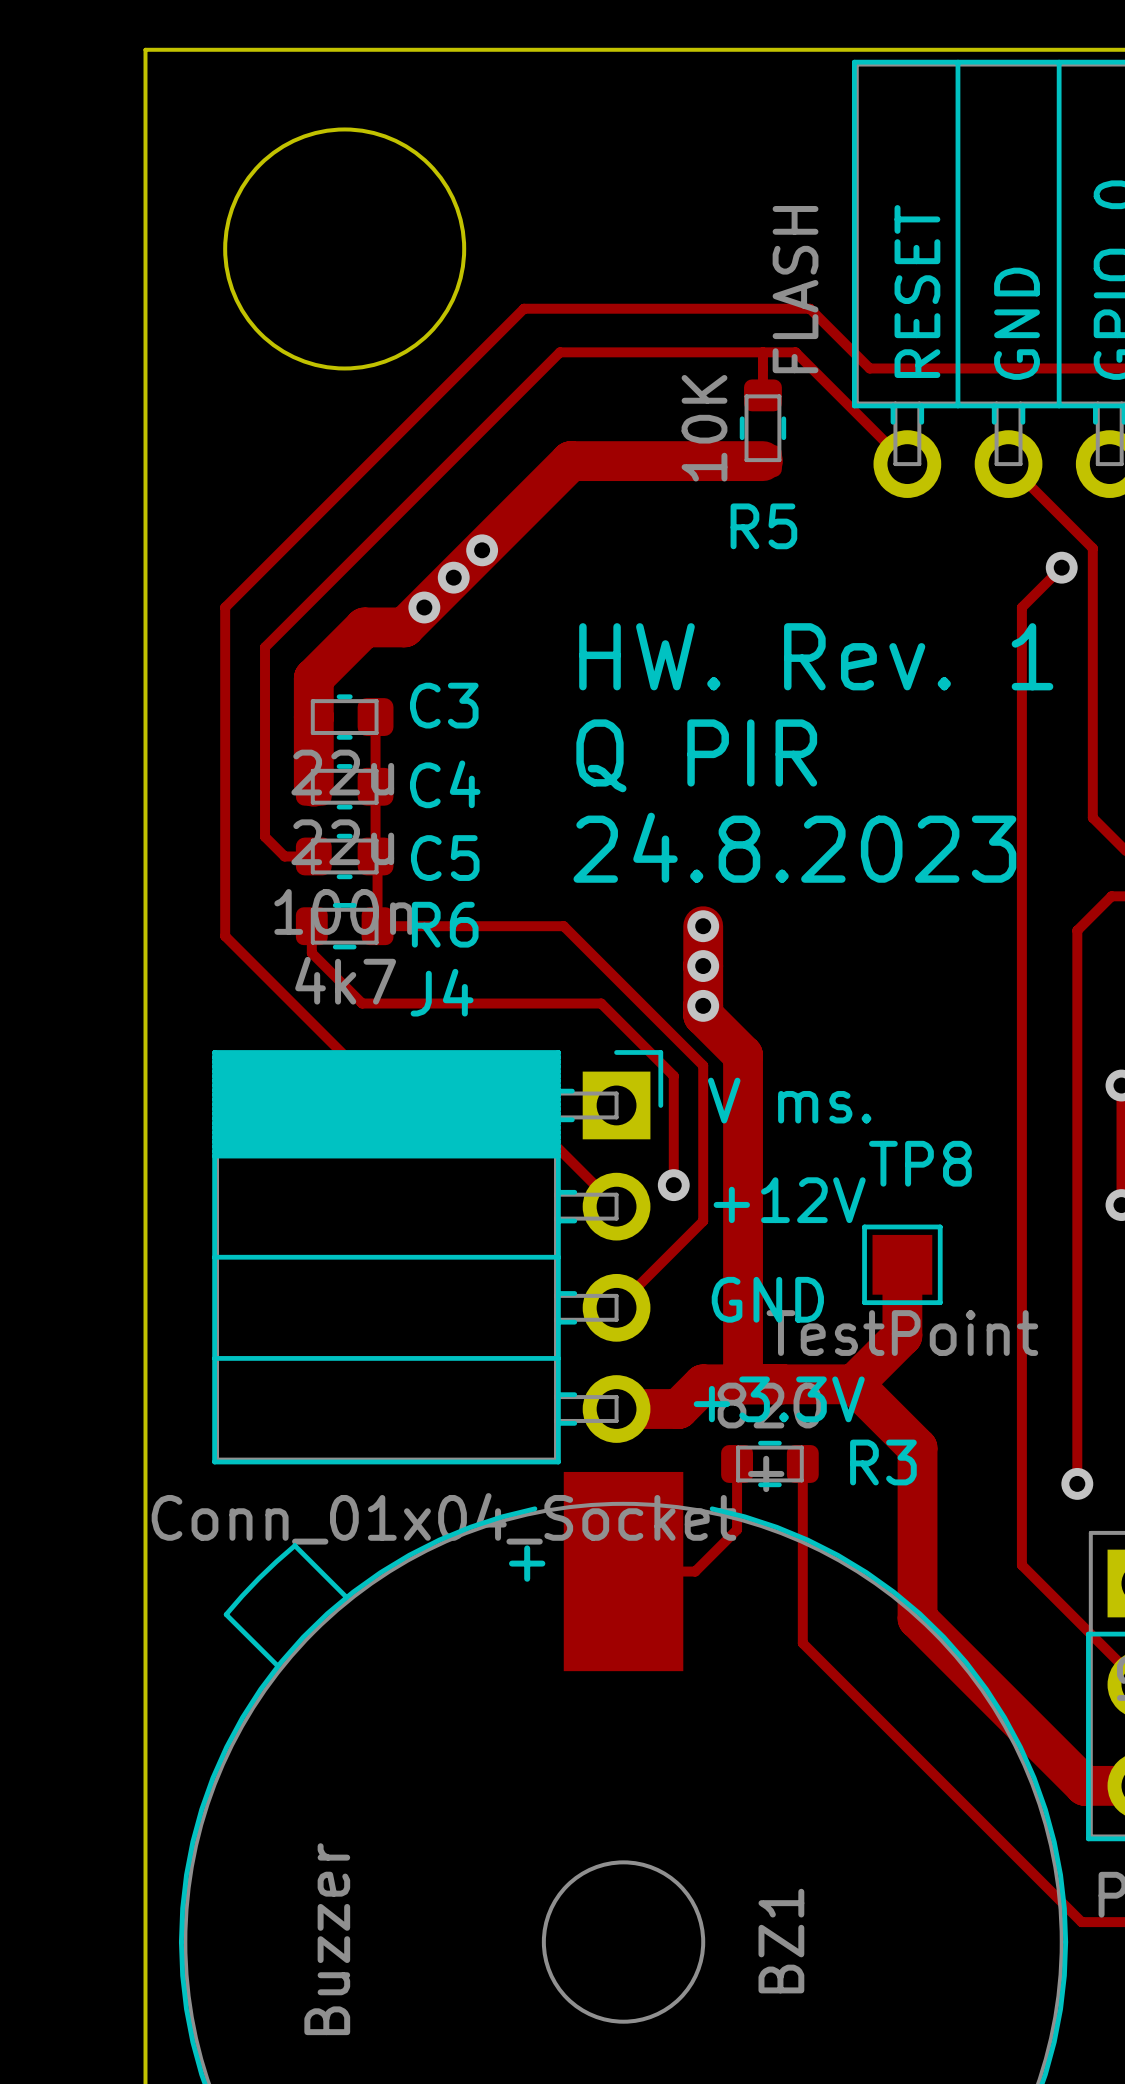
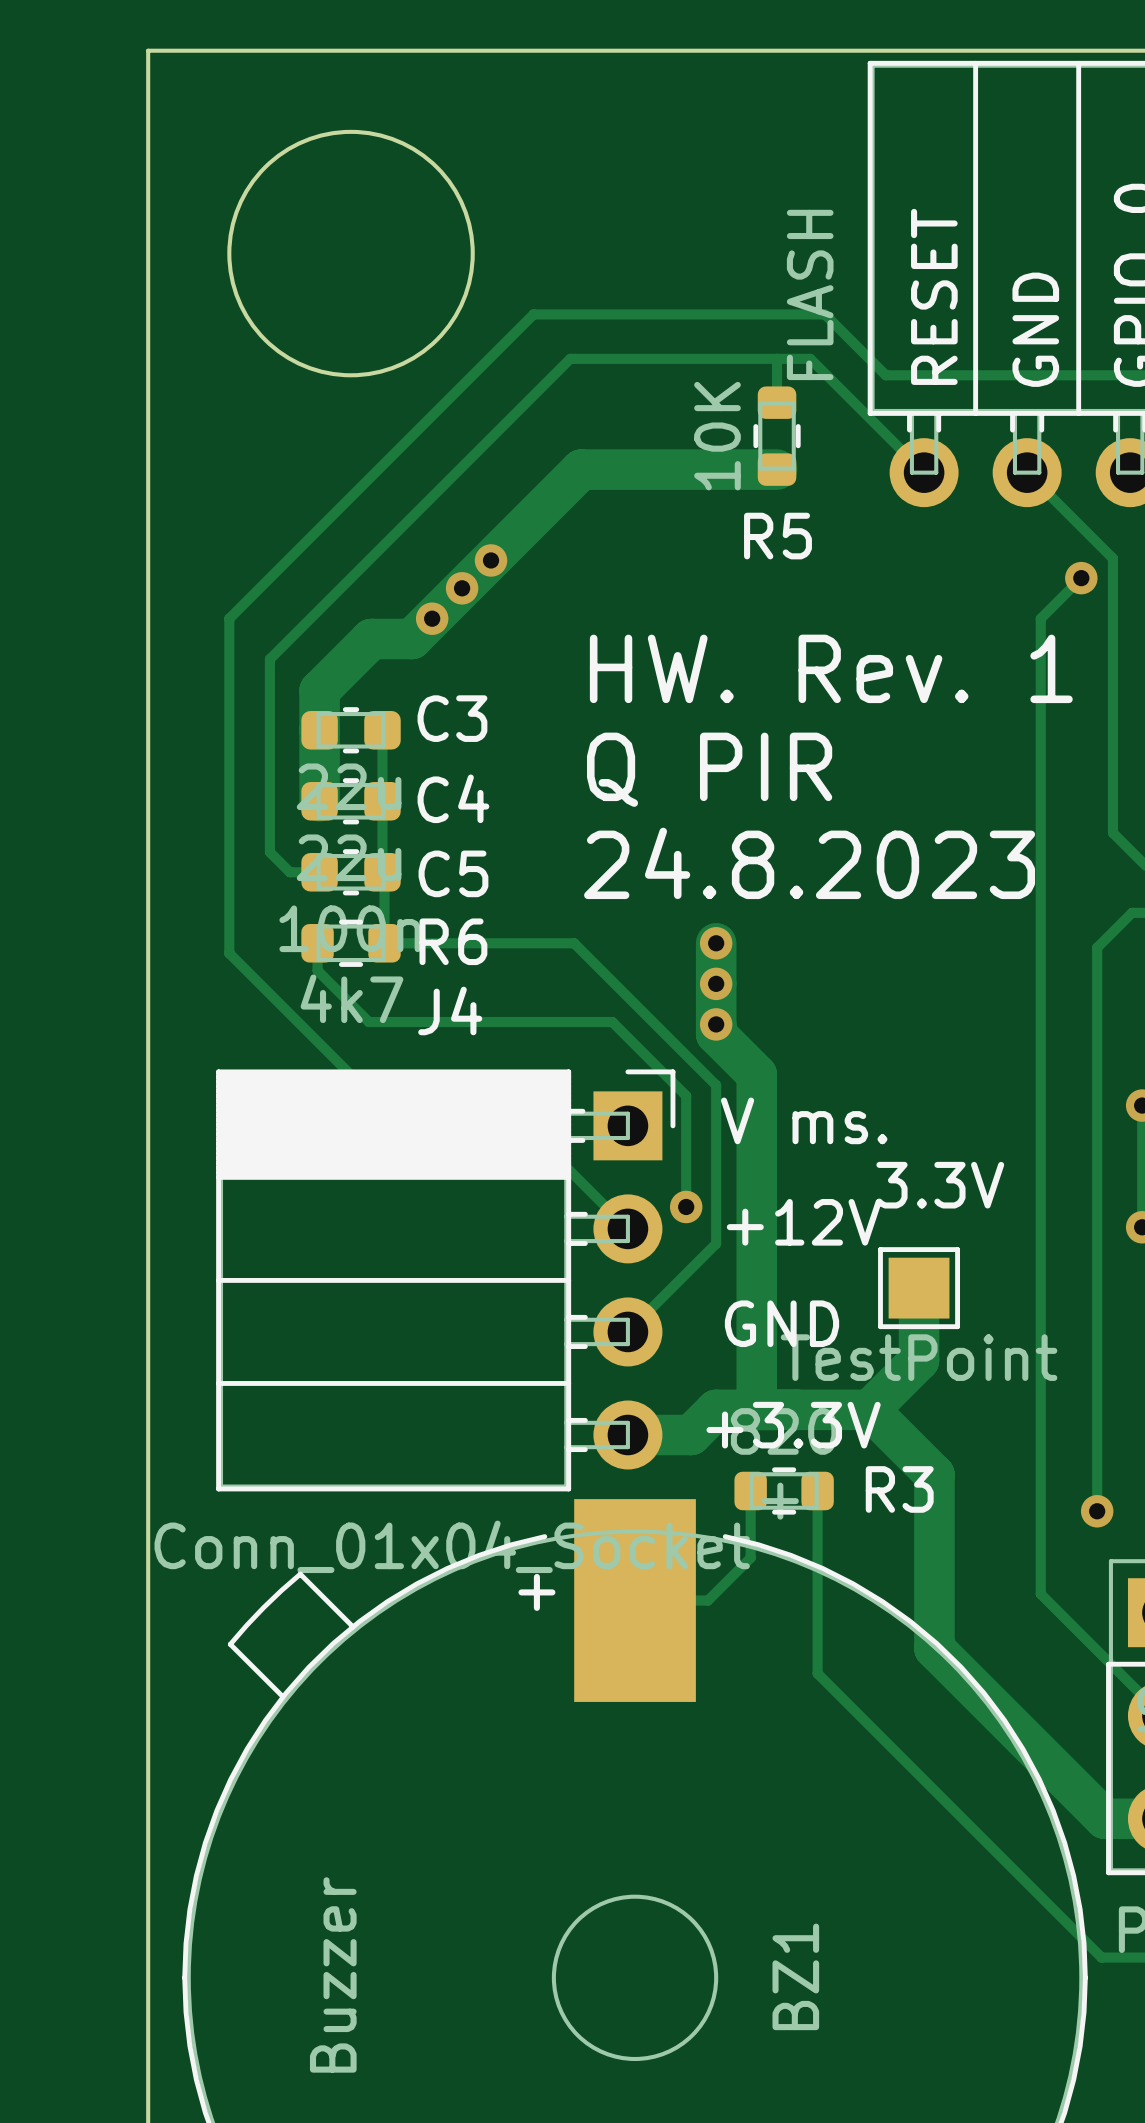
TP8 name: TP8 (920, 1163) -> 3.3V (940, 1185)

